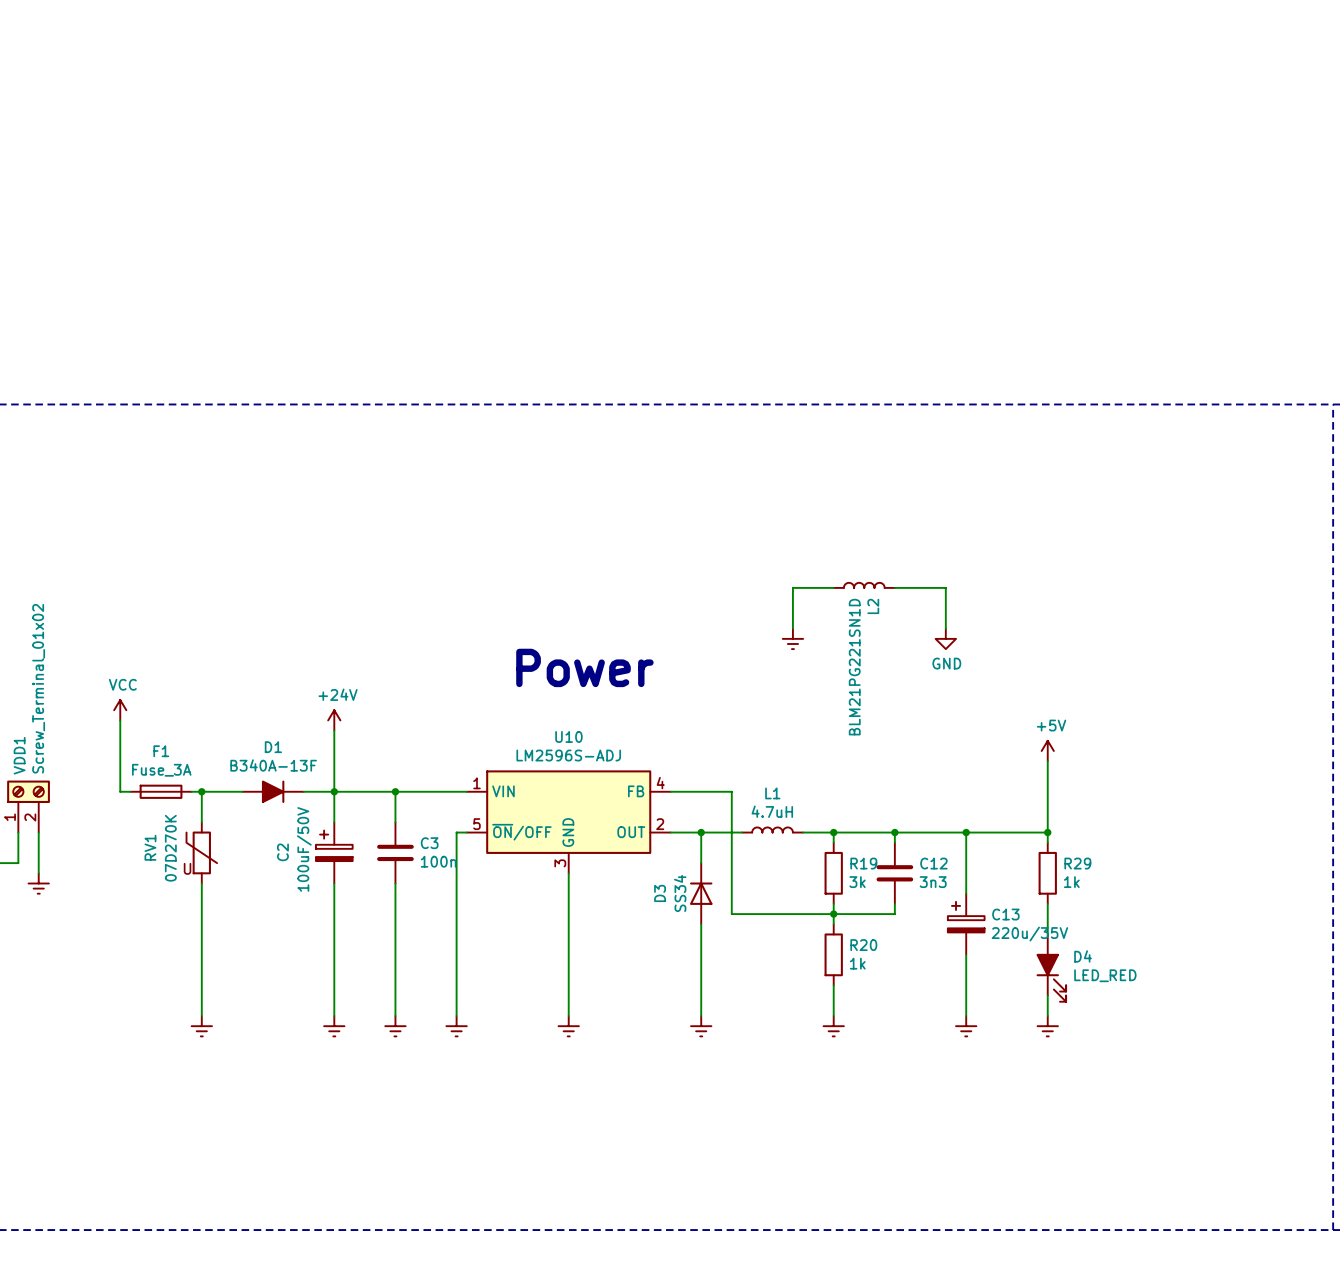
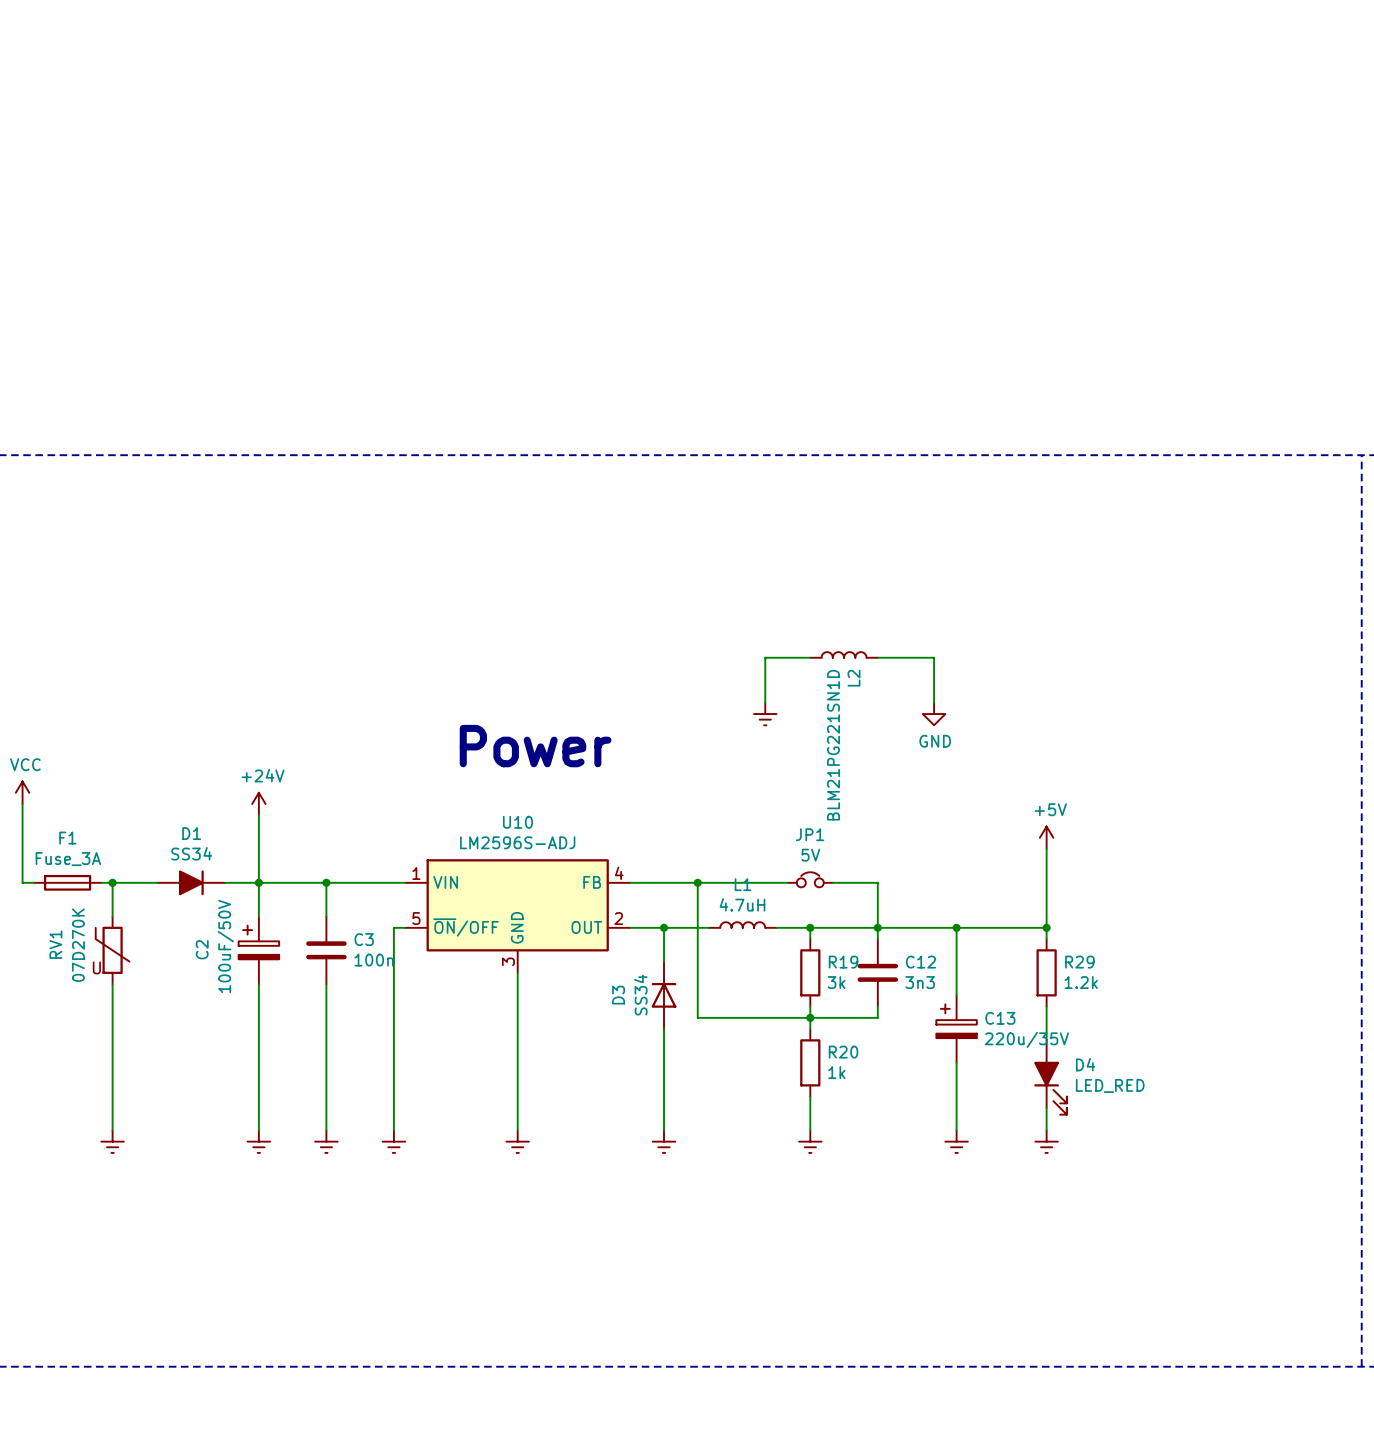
D1 value: B340A-13F (273, 765) -> SS34 (191, 853)
JP1: none -> 5V (810, 879)
wire: none -> (697, 882) (787, 882)
junction: none -> (697, 882)
wire: none -> (832, 882) (877, 882) (877, 927)
R29 value: 1k (1071, 882) -> 1.2k (1081, 982)

